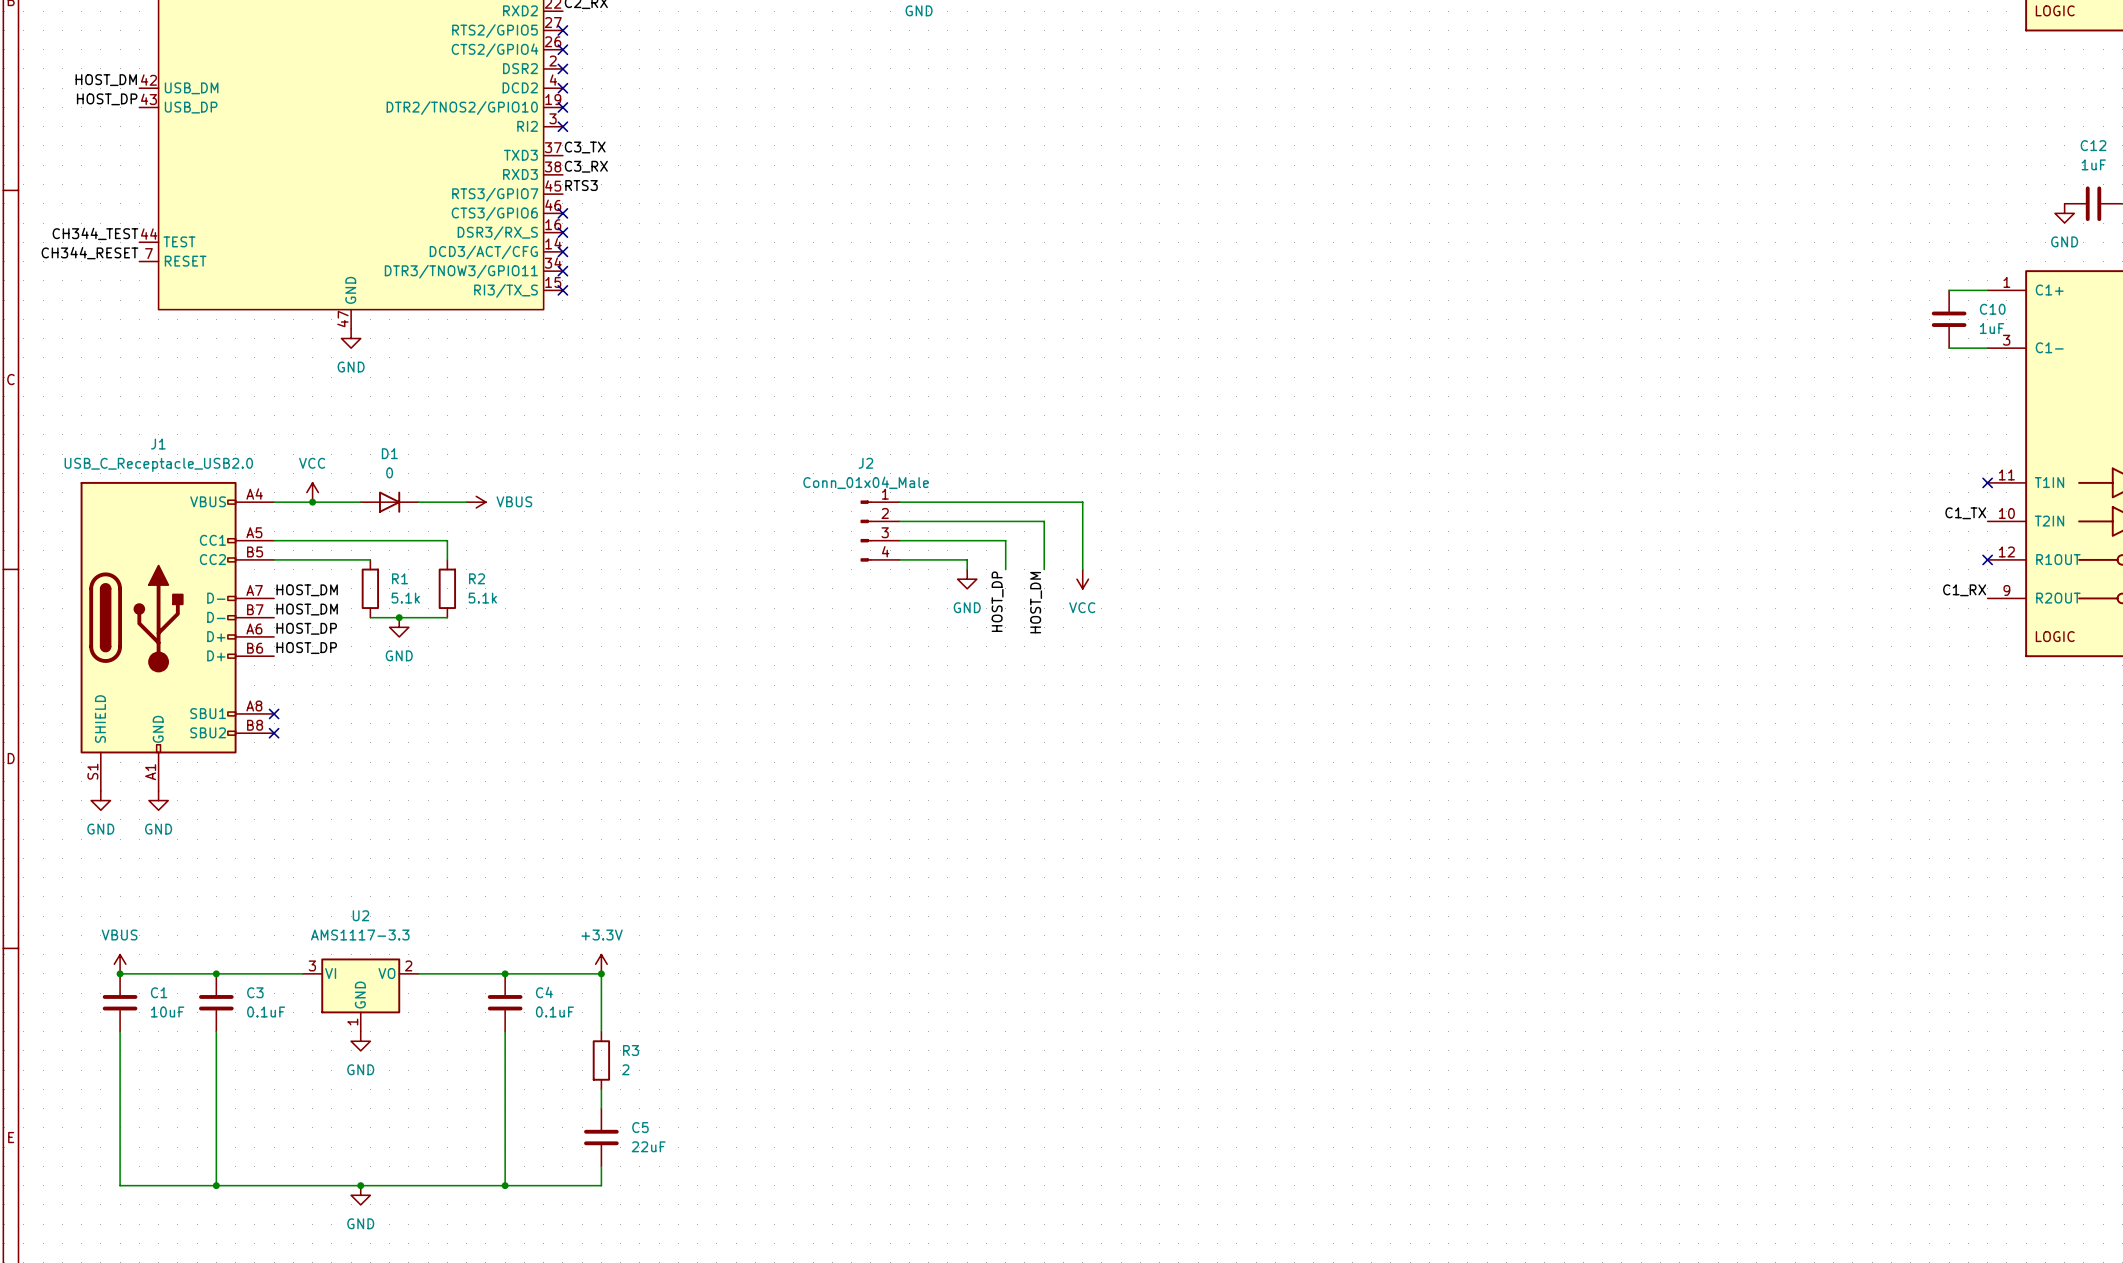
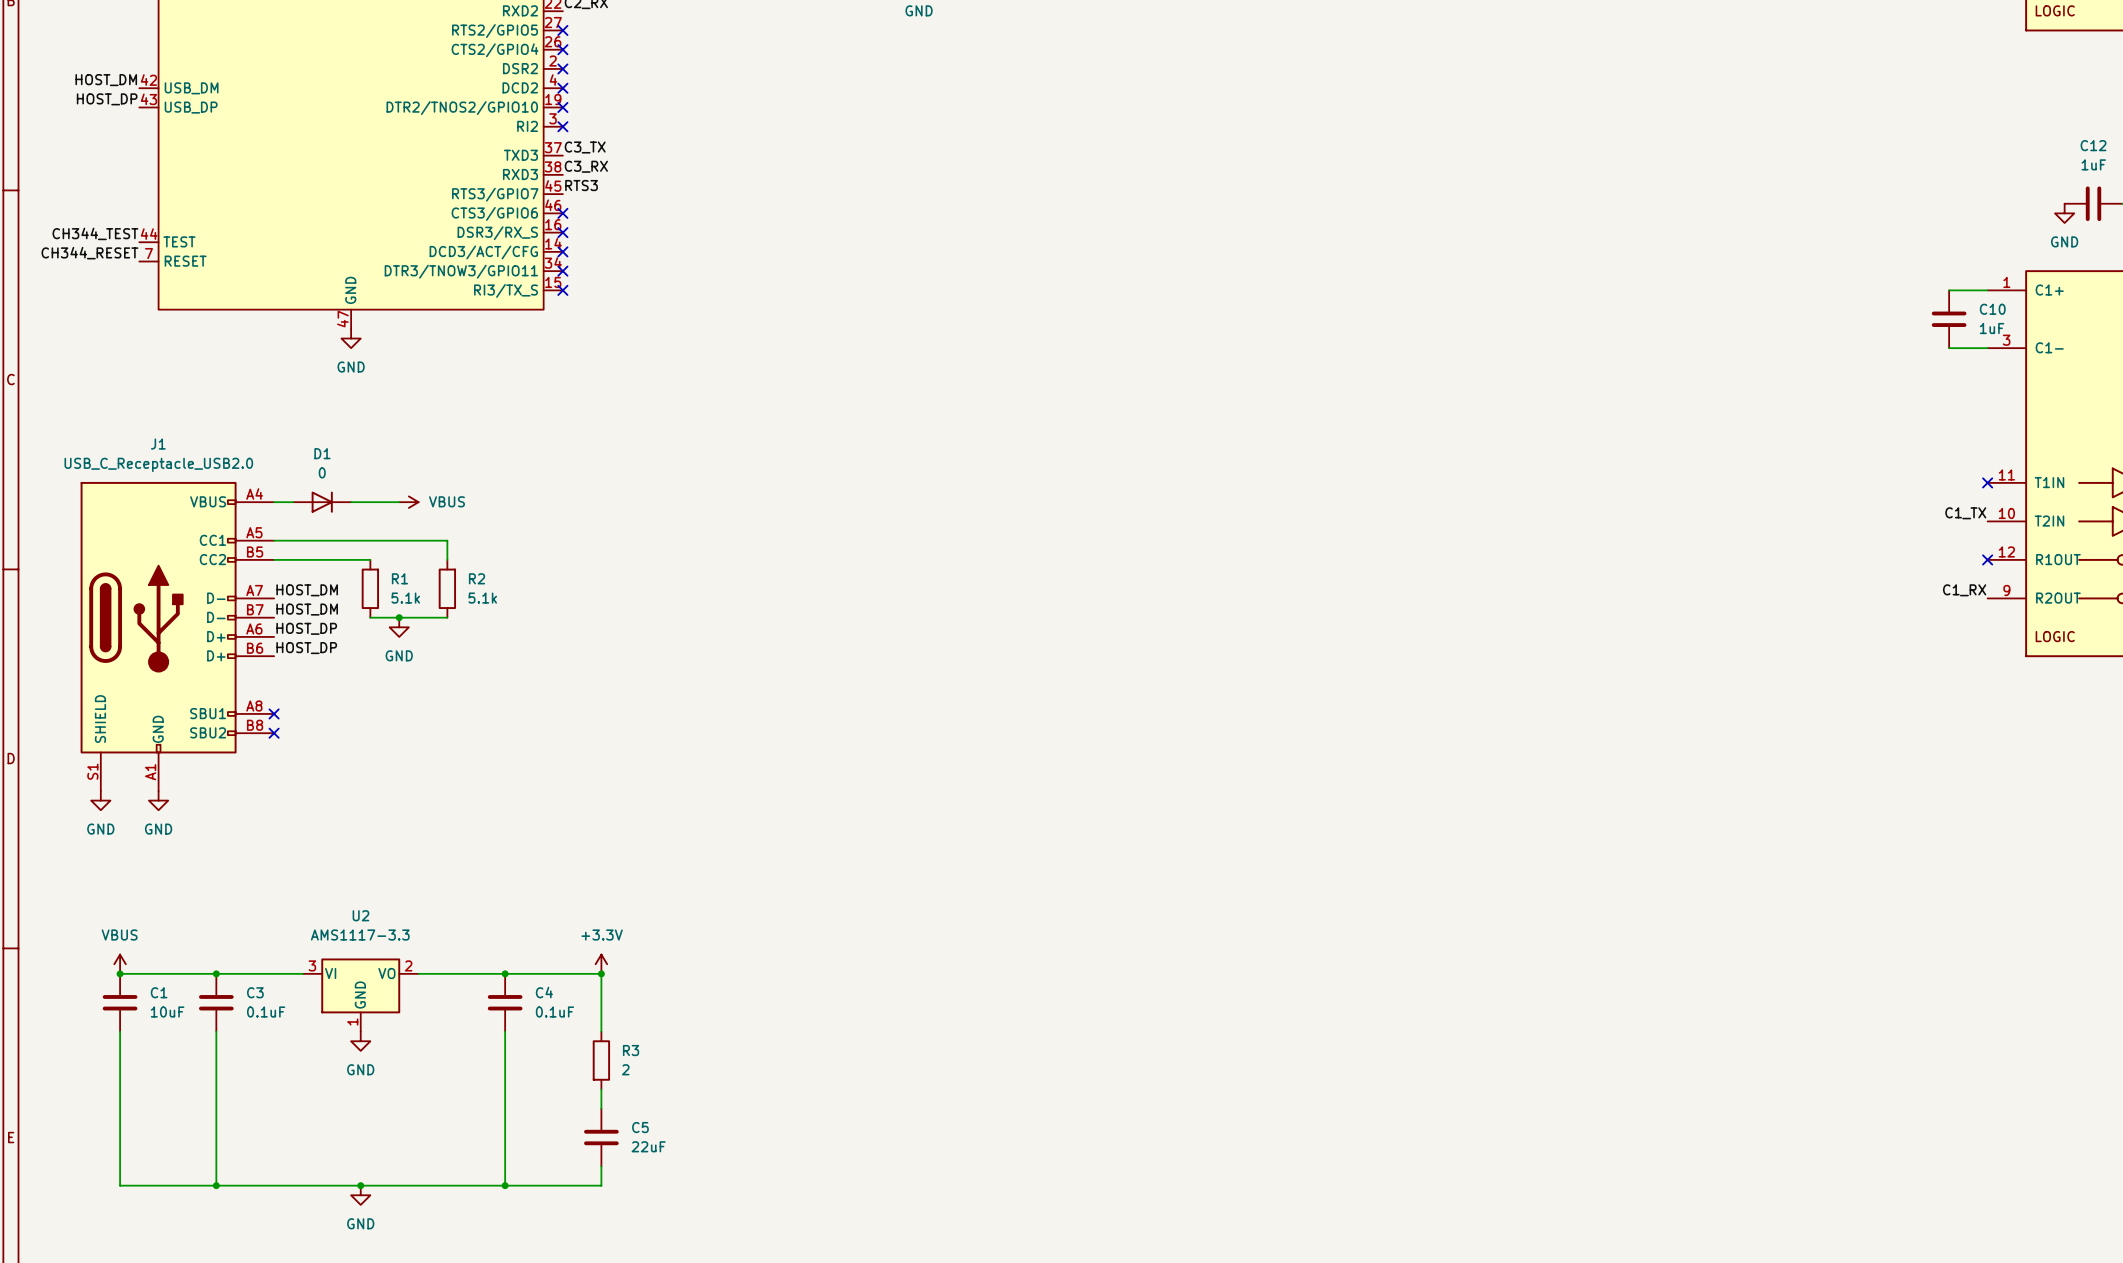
power symbol: VCC (312, 492) -> none
junction: (312, 502) -> none
D1 position: (389, 502) -> (322, 502)
wire: (418, 502) (466, 502) -> none
power symbol position: VBUS (476, 502) -> VBUS (408, 502)
wire: (899, 502) (1082, 502) (1082, 569) -> none
wire: (899, 521) (1044, 521) (1044, 569) -> none
J2: Conn_01x04_Male (880, 531) -> none
wire: (899, 540) (1005, 540) (1005, 569) -> none
wire: (899, 559) (967, 559) (967, 569) -> none
power symbol: GND (967, 579) -> none
power symbol: VCC (1082, 579) -> none
label: HOST_DP (997, 601) -> none
label: HOST_DM (1036, 602) -> none

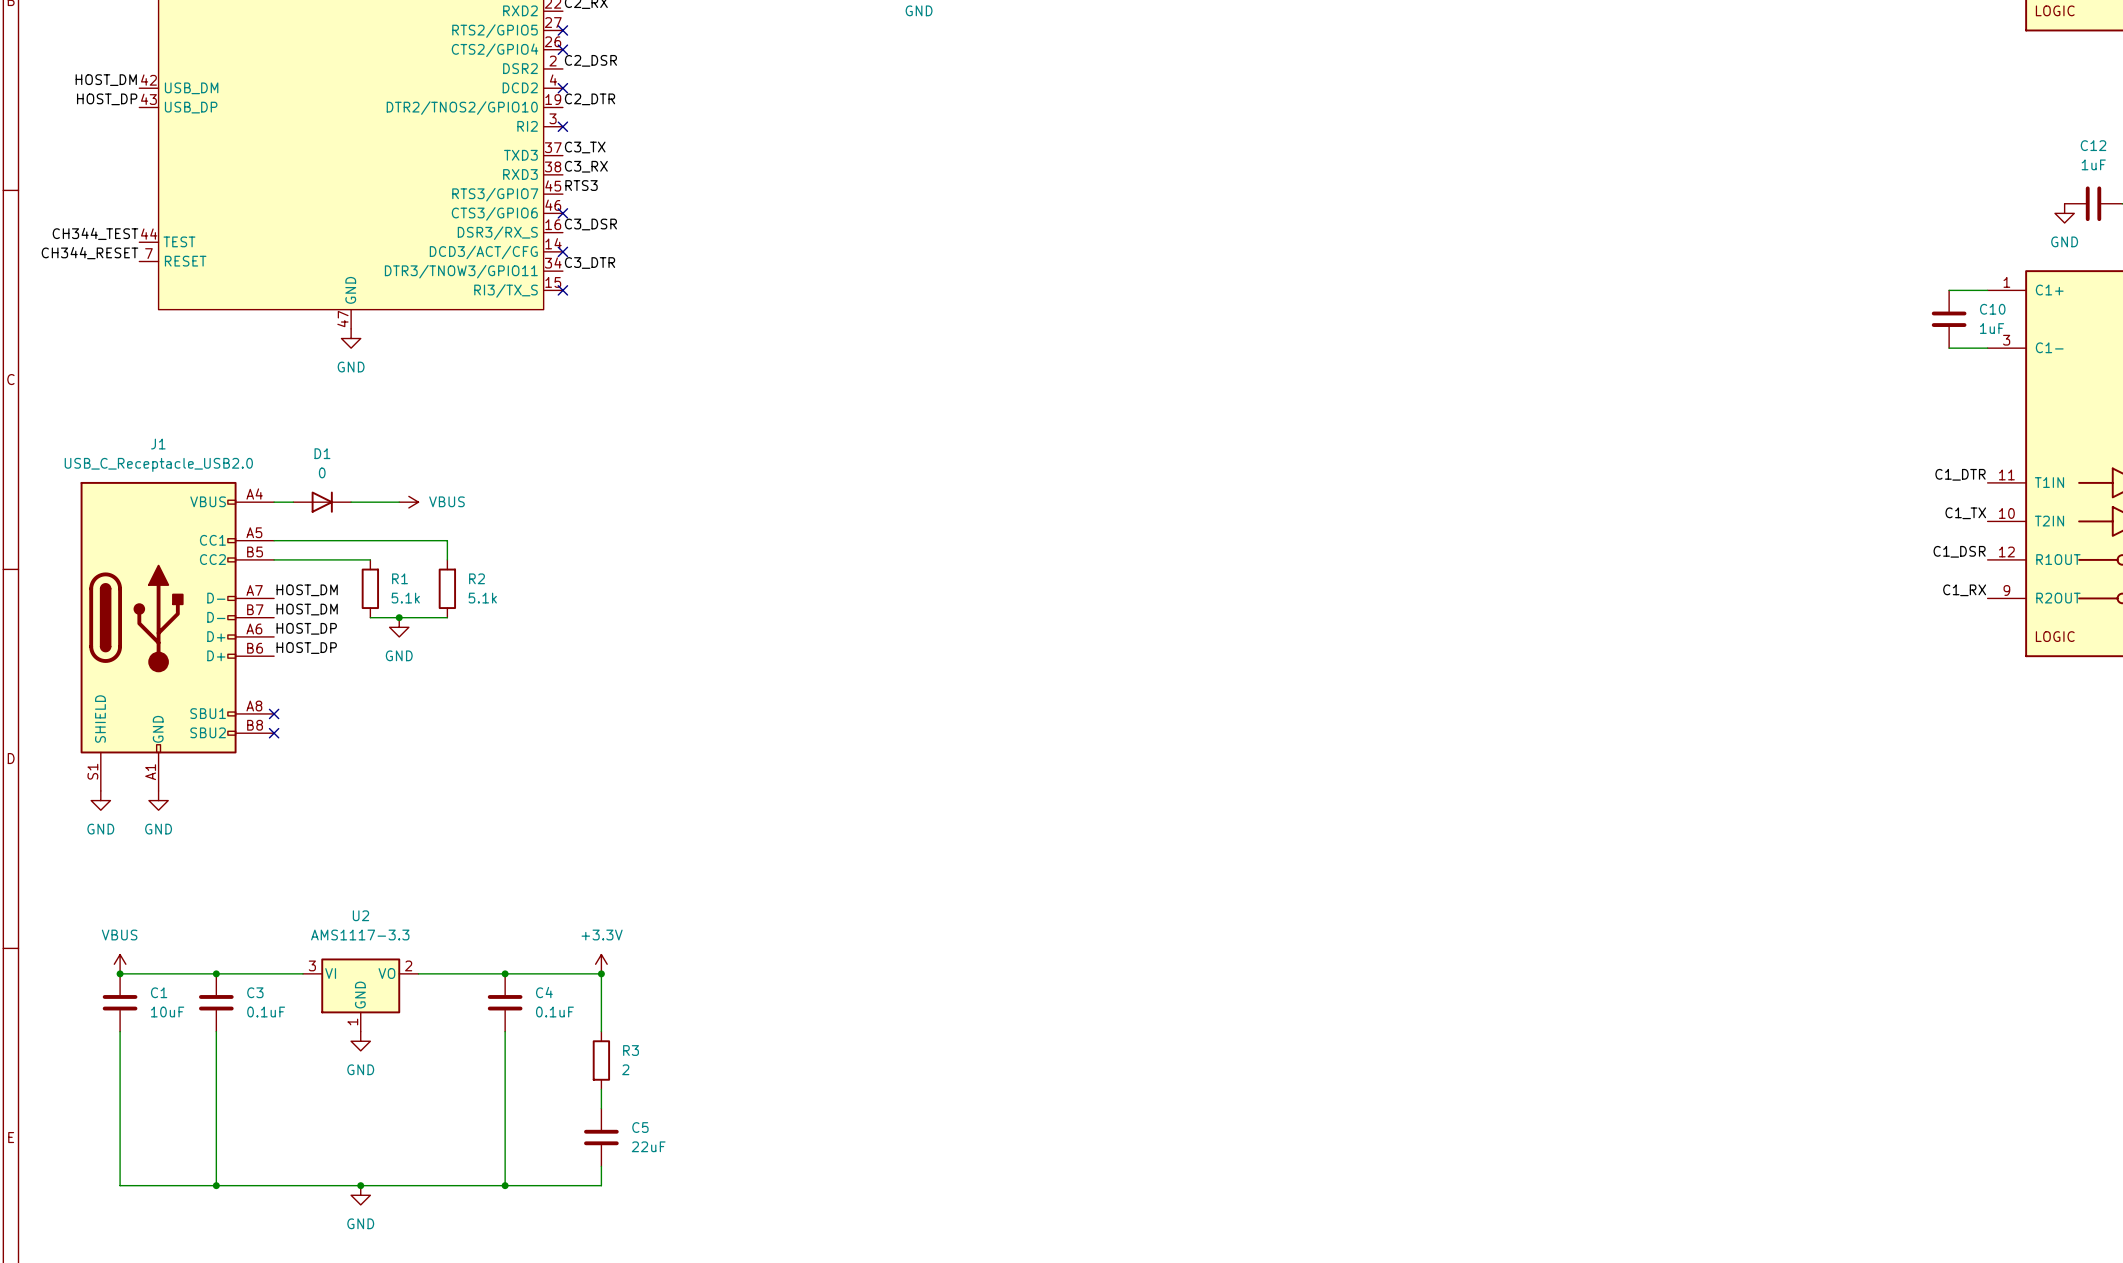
label: none -> C2_DSR (590, 60)
no-connect mark: (562, 68) -> none
label: none -> C2_DTR (590, 99)
no-connect mark: (562, 107) -> none
label: none -> C3_DSR (590, 224)
no-connect mark: (562, 232) -> none
label: none -> C3_DTR (590, 263)
no-connect mark: (562, 271) -> none
label: none -> C1_DTR (1960, 474)
no-connect mark: (1987, 482) -> none
label: none -> C1_DSR (1959, 551)
no-connect mark: (1987, 559) -> none

